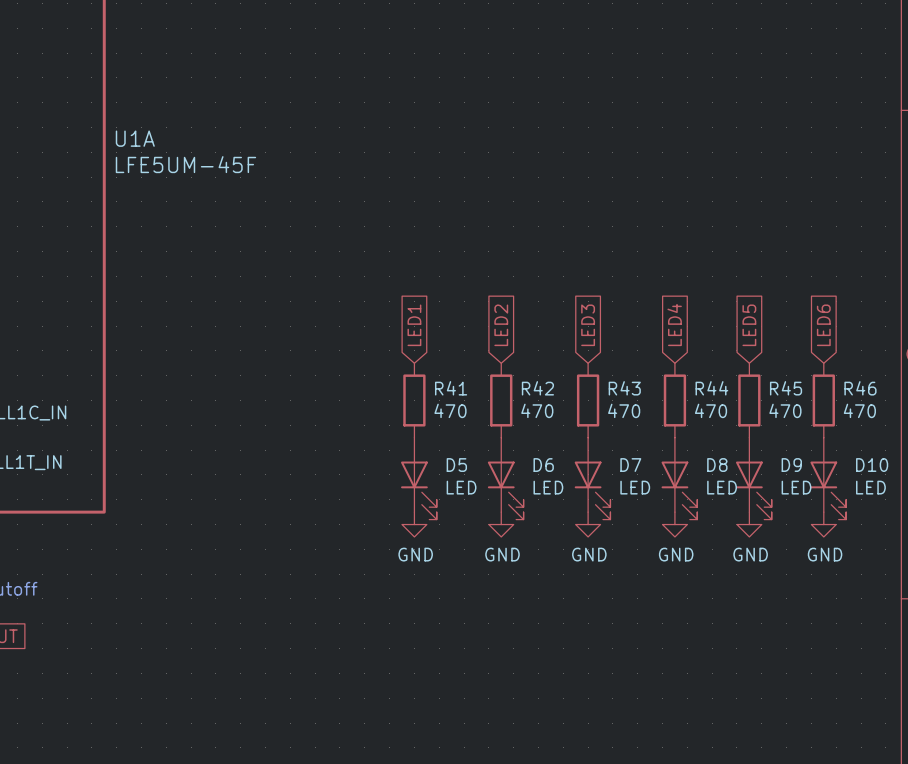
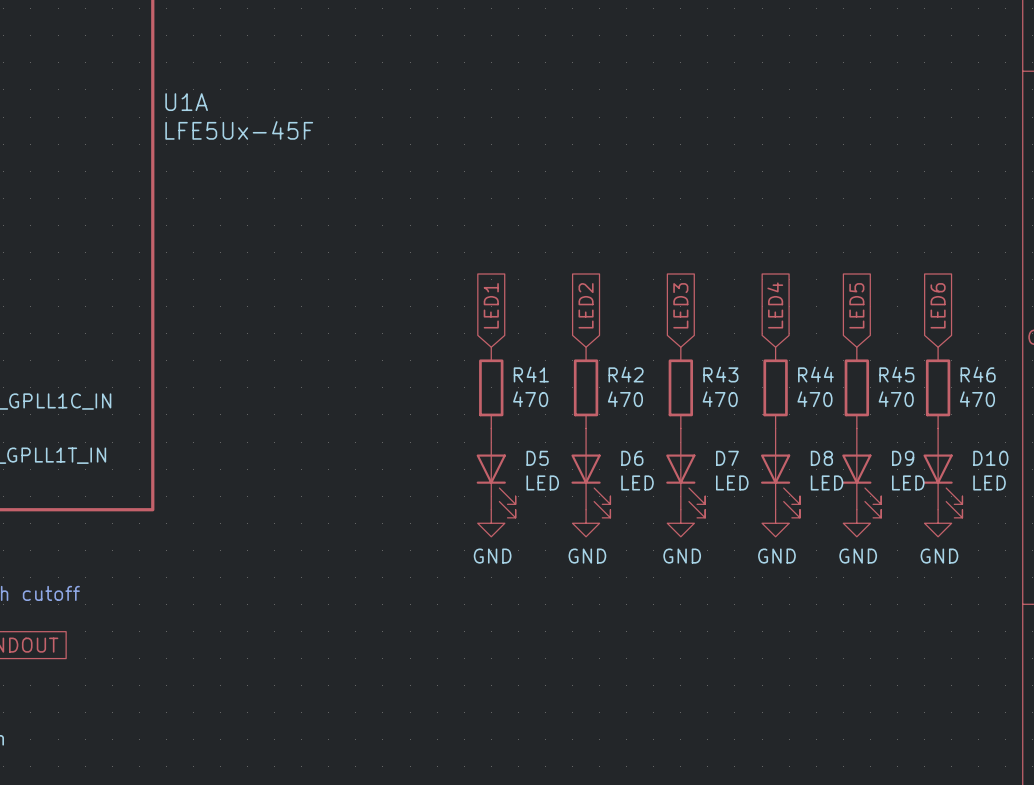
U1A value: LFE5UM-45F (185, 164) -> LFE5Ux-45F (239, 130)

